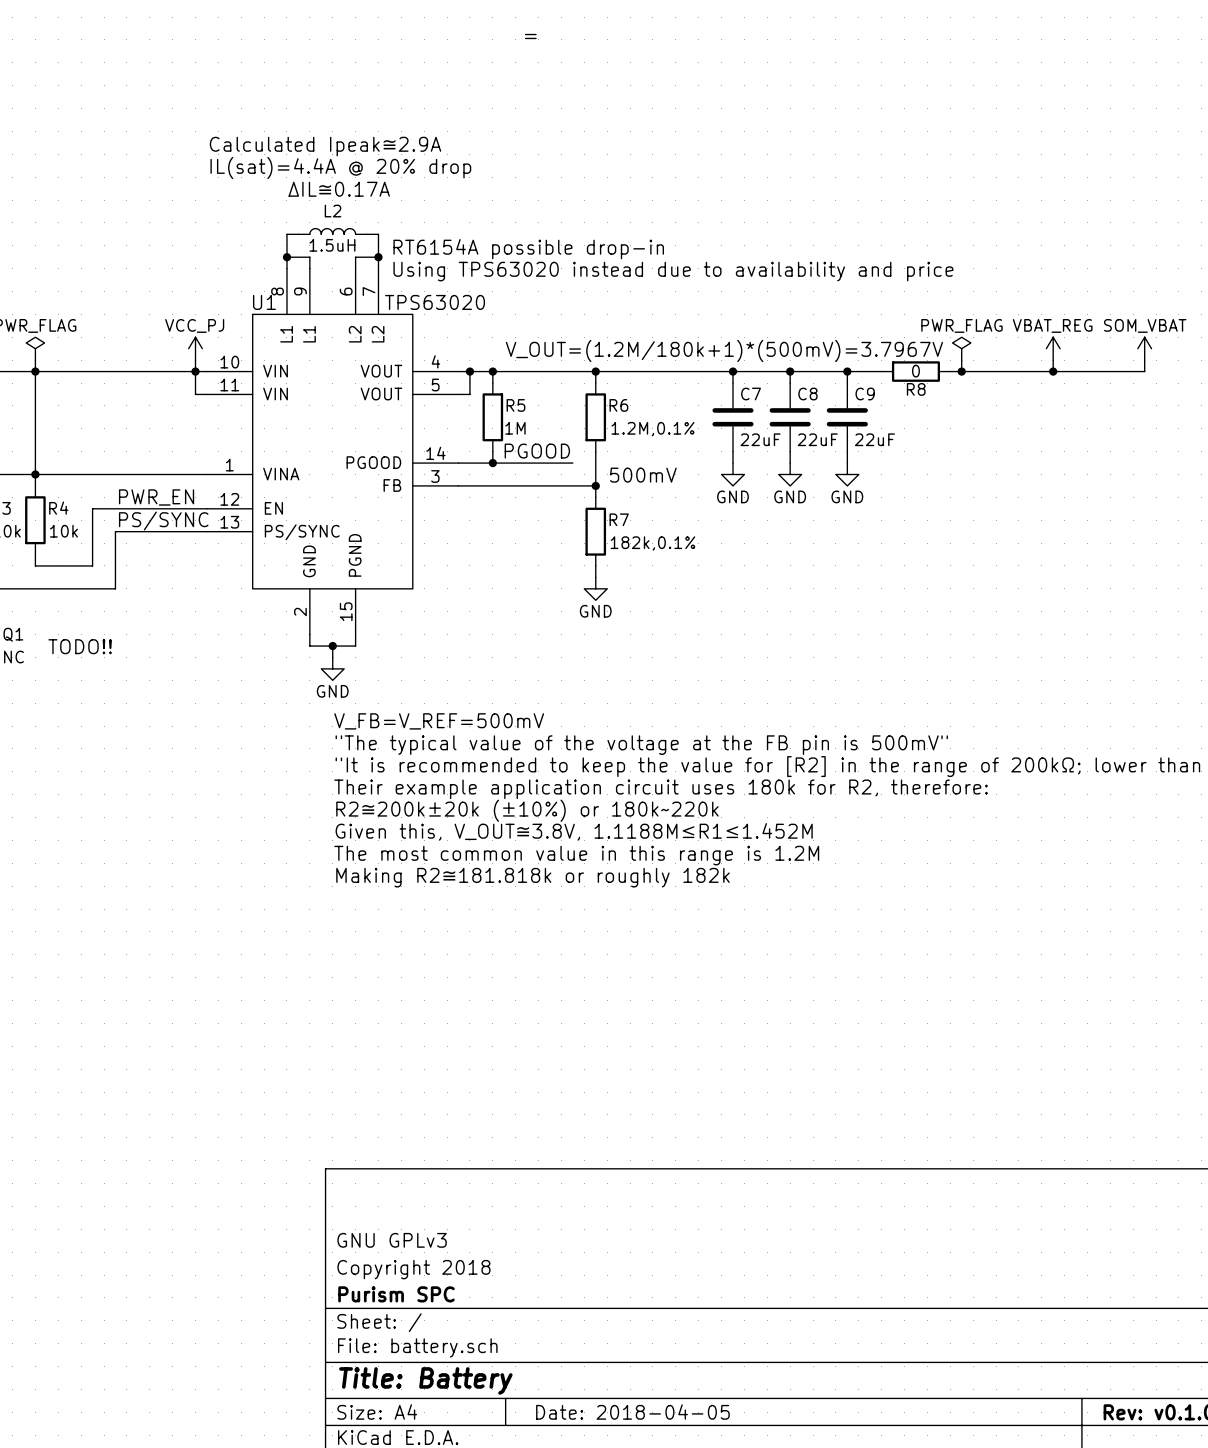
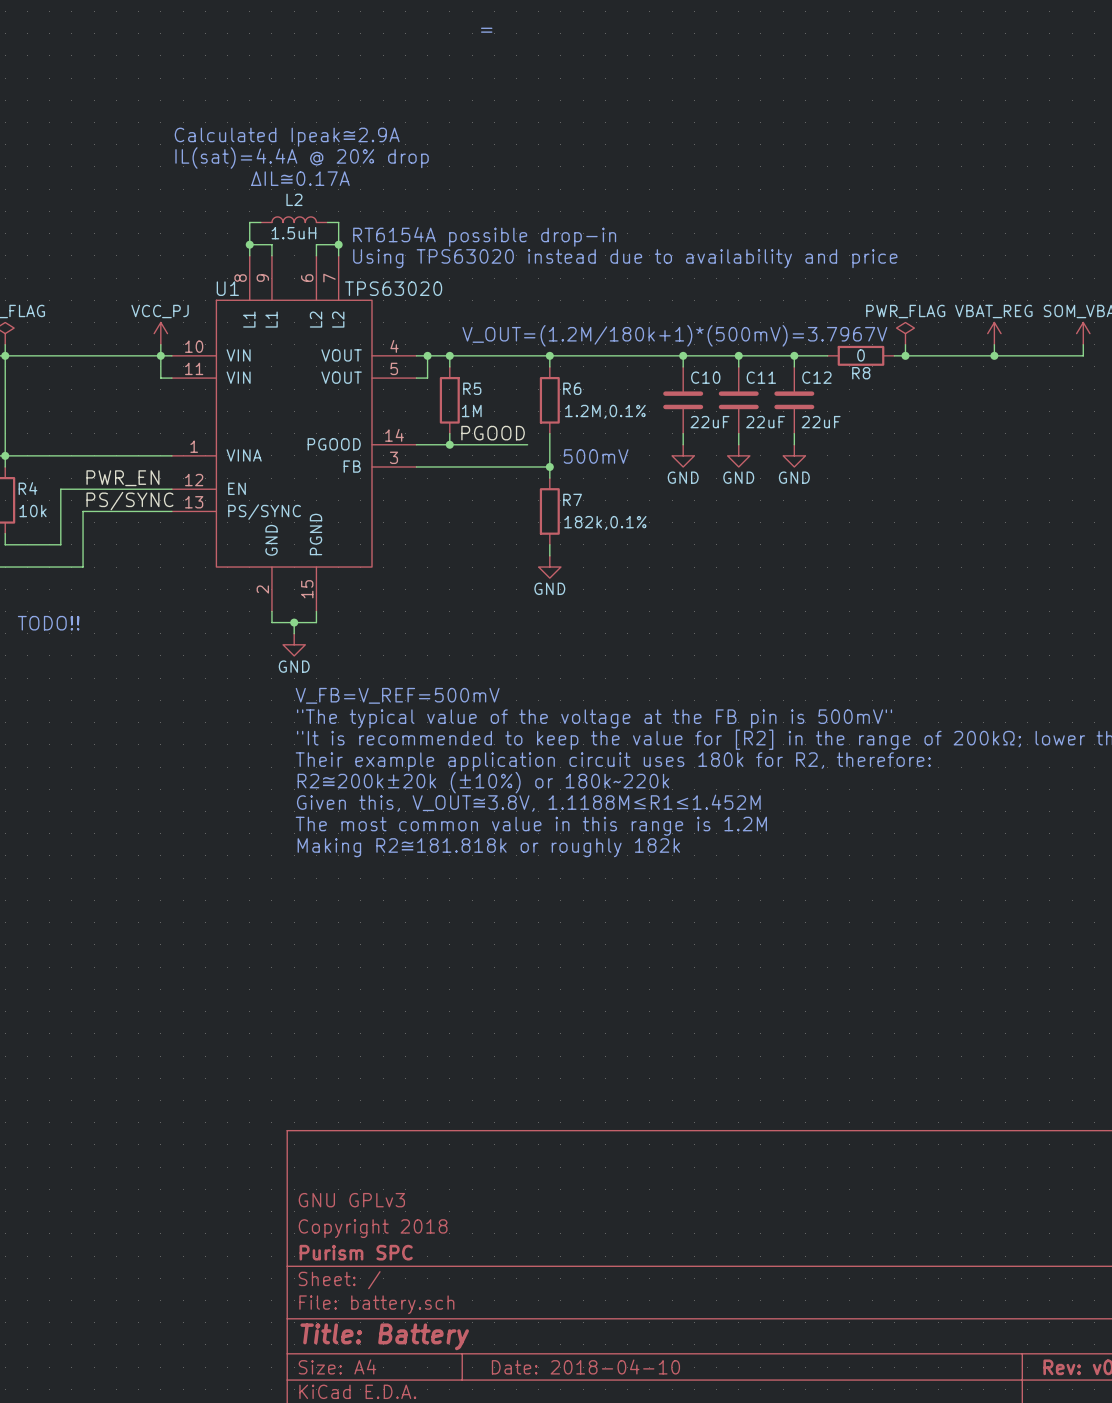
C7 name: C7 (751, 394) -> C10 (705, 377)
C8 name: C8 (807, 394) -> C11 (761, 377)
C9 name: C9 (865, 394) -> C12 (816, 377)
title block: Date: 2018-04-05 (632, 1412) -> Date: 2018-04-10 (585, 1367)

